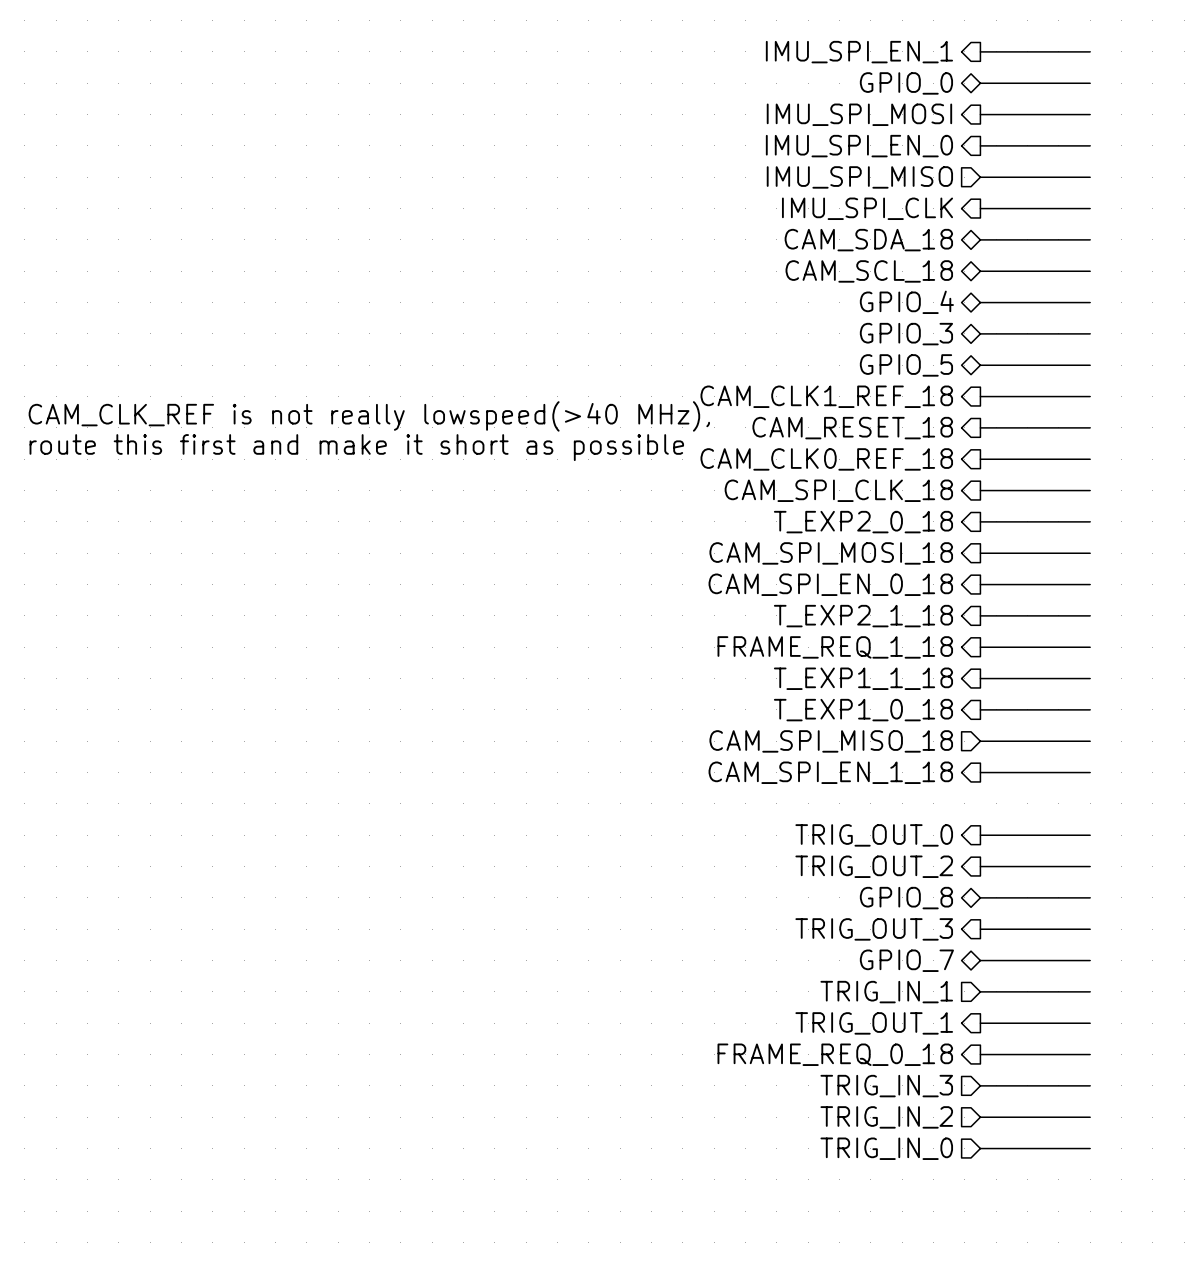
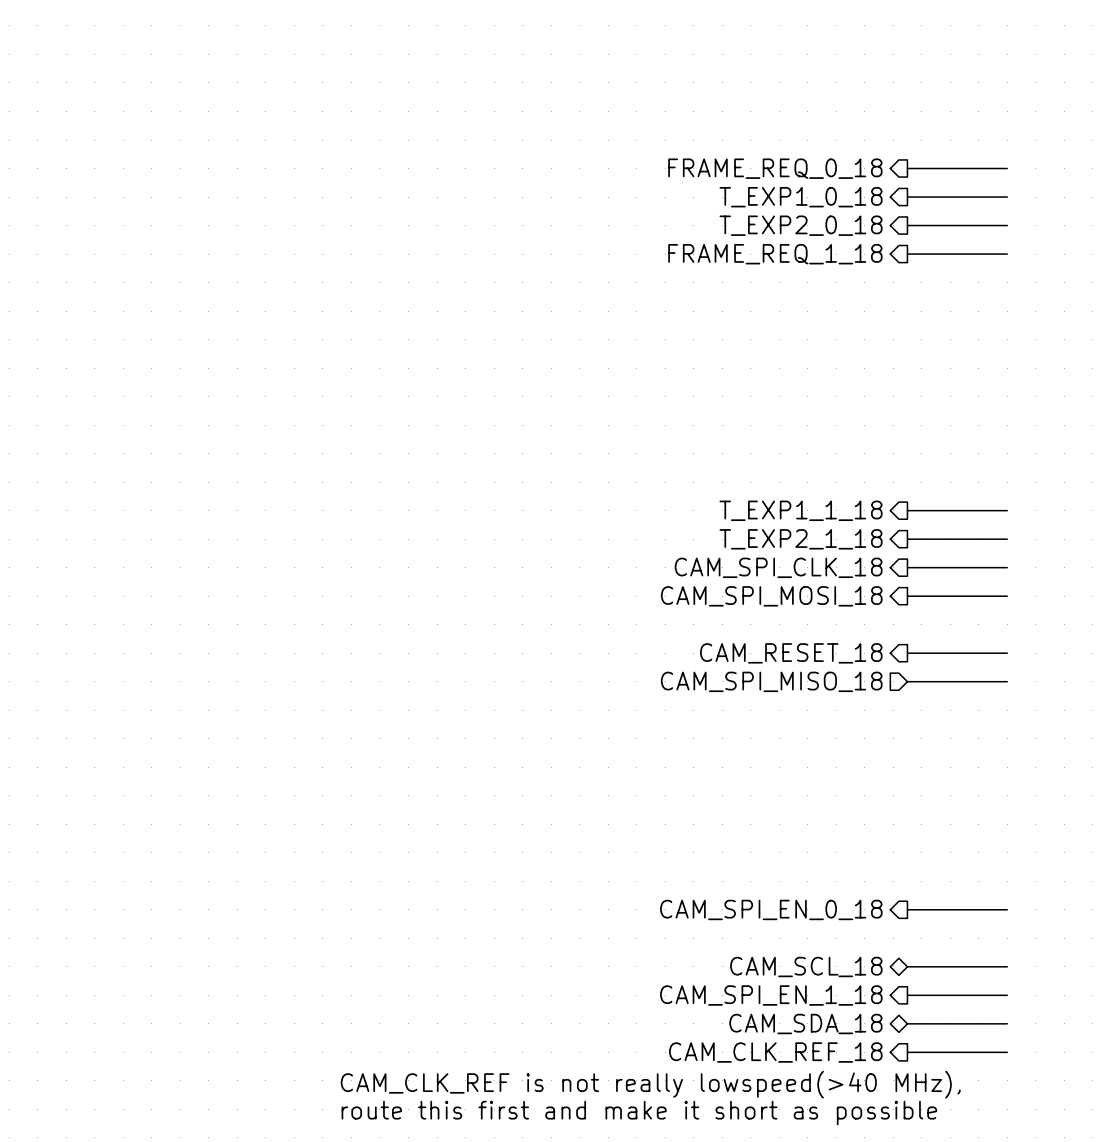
wire: (980, 51) (1090, 51) -> none
hierarchical label: IMU_SPI_EN_1 (859, 52) -> none
hierarchical label: GPIO_0 (906, 83) -> none
wire: (980, 83) (1090, 83) -> none
hierarchical label: IMU_SPI_MOSI (859, 114) -> none
wire: (980, 114) (1090, 114) -> none
wire: (980, 145) (1090, 145) -> none
hierarchical label: IMU_SPI_EN_0 (859, 146) -> none
hierarchical label shape: input (859, 177) -> output (775, 168)
hierarchical label: IMU_SPI_MISO (859, 177) -> FRAME_REQ_0_18 (775, 168)
hierarchical label: IMU_SPI_CLK (867, 208) -> T_EXP1_0_18 (801, 197)
hierarchical label shape: bidirectional (868, 240) -> output (801, 225)
hierarchical label: CAM_SDA_18 (868, 240) -> T_EXP2_0_18 (801, 225)
hierarchical label shape: bidirectional (869, 271) -> output (775, 254)
hierarchical label: CAM_SCL_18 (869, 271) -> FRAME_REQ_1_18 (775, 254)
hierarchical label: GPIO_4 (906, 302) -> none
wire: (980, 302) (1090, 302) -> none
wire: (980, 333) (1090, 333) -> none
hierarchical label: GPIO_3 (906, 334) -> none
hierarchical label: GPIO_5 (906, 365) -> none
wire: (980, 365) (1090, 365) -> none
hierarchical label: CAM_CLK1_REF_18 (826, 396) -> none
wire: (980, 396) (1090, 396) -> none
text: CAM_CLK_REF is not really lowspeed(>40 MHz), (369, 416) -> none
wire: (980, 427) (1090, 427) -> none
hierarchical label: CAM_RESET_18 (852, 428) -> none
text: route this first and make it short as possible (356, 447) -> none
hierarchical label: CAM_CLK0_REF_18 (826, 459) -> none
wire: (980, 459) (1090, 459) -> none
hierarchical label: CAM_SPI_CLK_18 (838, 490) -> none
wire: (980, 490) (1090, 490) -> none
wire: (980, 521) (1090, 521) -> none
hierarchical label: T_EXP2_0_18 (863, 522) -> none
hierarchical label: CAM_SPI_MOSI_18 (831, 553) -> T_EXP1_1_18 (801, 510)
hierarchical label: CAM_SPI_EN_0_18 (830, 584) -> T_EXP2_1_18 (801, 539)
hierarchical label: T_EXP2_1_18 (863, 616) -> CAM_SPI_CLK_18 (778, 567)
hierarchical label: FRAME_REQ_1_18 (835, 647) -> CAM_SPI_MOSI_18 (771, 596)
hierarchical label: T_EXP1_1_18 (863, 678) -> none
wire: (980, 678) (1090, 678) -> none
hierarchical label: T_EXP1_0_18 (863, 710) -> CAM_RESET_18 (791, 653)
hierarchical label: CAM_SPI_EN_1_18 (830, 772) -> none
wire: (980, 772) (1090, 772) -> none
hierarchical label: TRIG_OUT_0 (874, 835) -> none
wire: (980, 835) (1090, 835) -> none
hierarchical label: TRIG_OUT_2 (874, 866) -> none
wire: (980, 866) (1090, 866) -> none
wire: (980, 897) (1090, 897) -> none
hierarchical label: GPIO_8 (906, 898) -> none
hierarchical label: TRIG_OUT_3 (874, 929) -> none
wire: (980, 929) (1090, 929) -> none
hierarchical label: GPIO_7 (906, 960) -> none
wire: (980, 960) (1090, 960) -> none
hierarchical label shape: input (886, 992) -> output (771, 909)
hierarchical label: TRIG_IN_1 (886, 992) -> CAM_SPI_EN_0_18 (771, 909)
hierarchical label: TRIG_OUT_1 (874, 1023) -> none
wire: (980, 1023) (1090, 1023) -> none
hierarchical label shape: output (835, 1054) -> bidirectional (806, 966)
hierarchical label: FRAME_REQ_0_18 (835, 1054) -> CAM_SCL_18 (806, 966)
hierarchical label shape: input (886, 1086) -> output (771, 995)
hierarchical label: TRIG_IN_3 (886, 1086) -> CAM_SPI_EN_1_18 (771, 995)
hierarchical label shape: input (886, 1117) -> bidirectional (805, 1024)
hierarchical label: TRIG_IN_2 (886, 1117) -> CAM_SDA_18 (805, 1024)
hierarchical label shape: input (886, 1148) -> output (775, 1052)
hierarchical label: TRIG_IN_0 (886, 1148) -> CAM_CLK_REF_18 (775, 1052)
text: none -> CAM_CLK_REF is not really lowspeed(>40 MHz), (650, 1084)
text: none -> route this first and make it short as possible (639, 1113)

